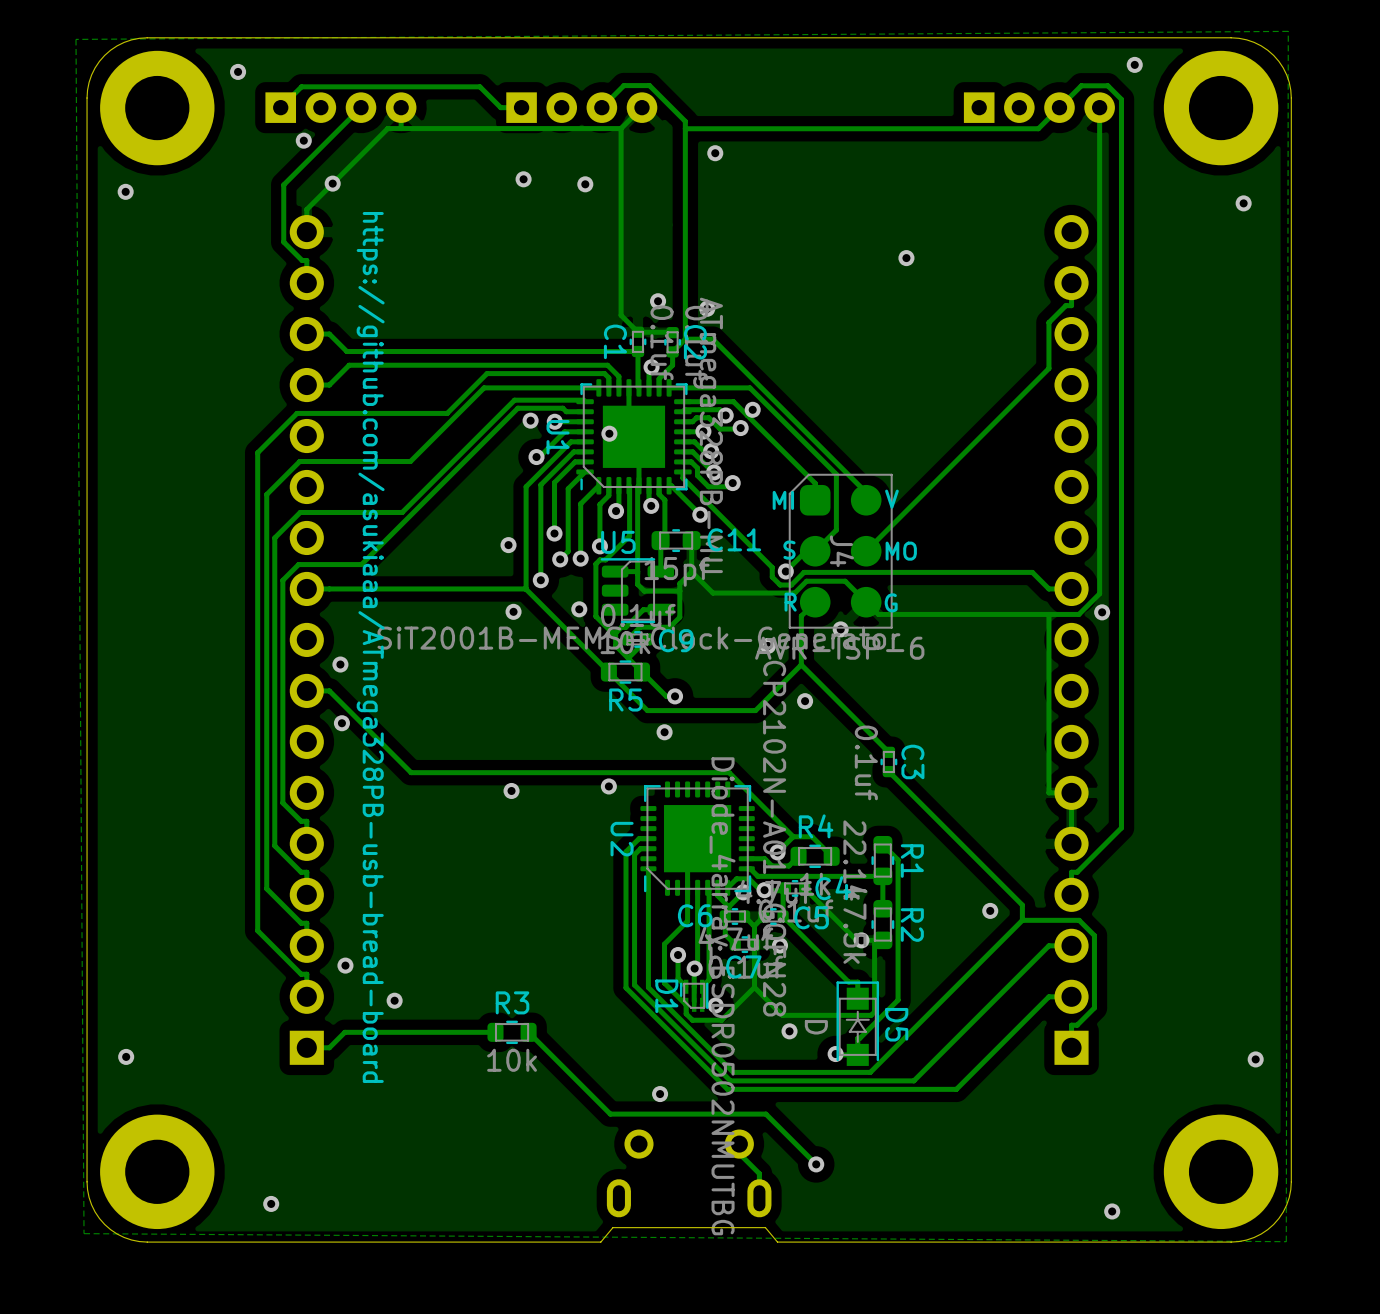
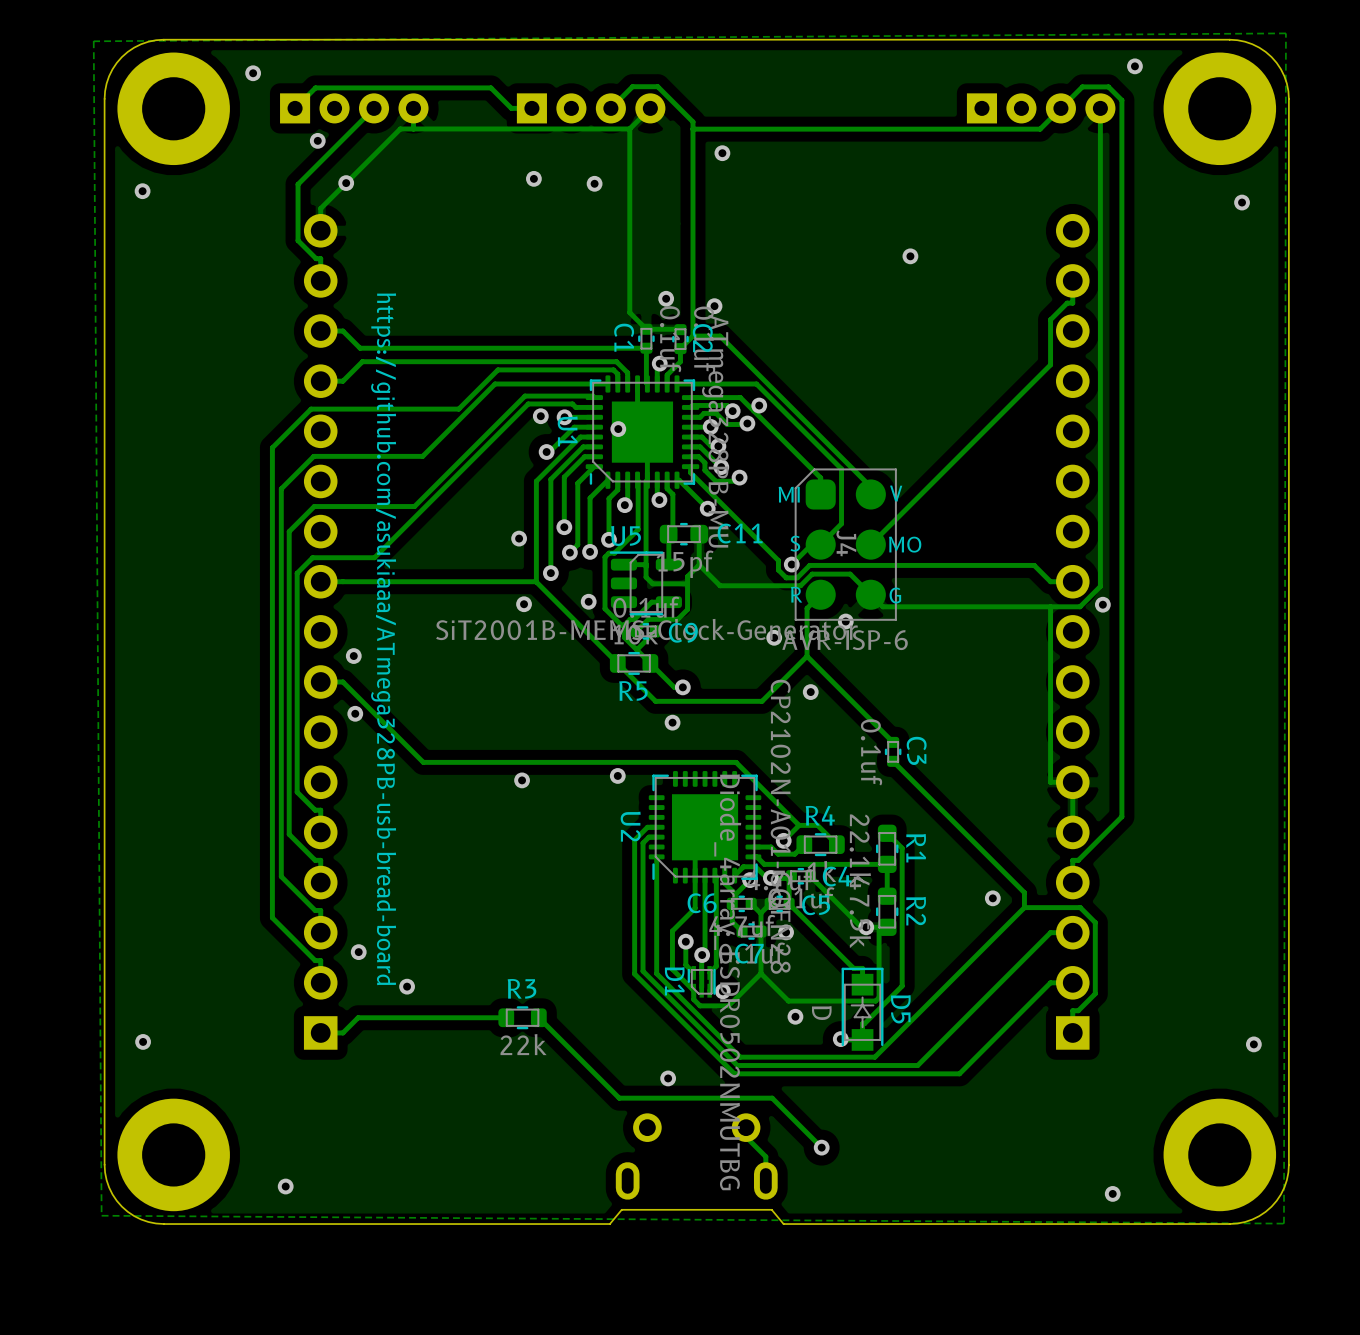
R3 value: 10k (512, 1060) -> 22k (523, 1044)

